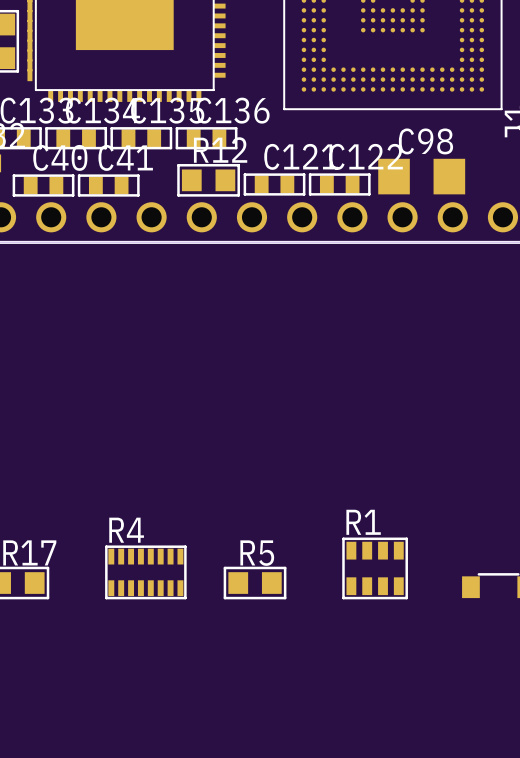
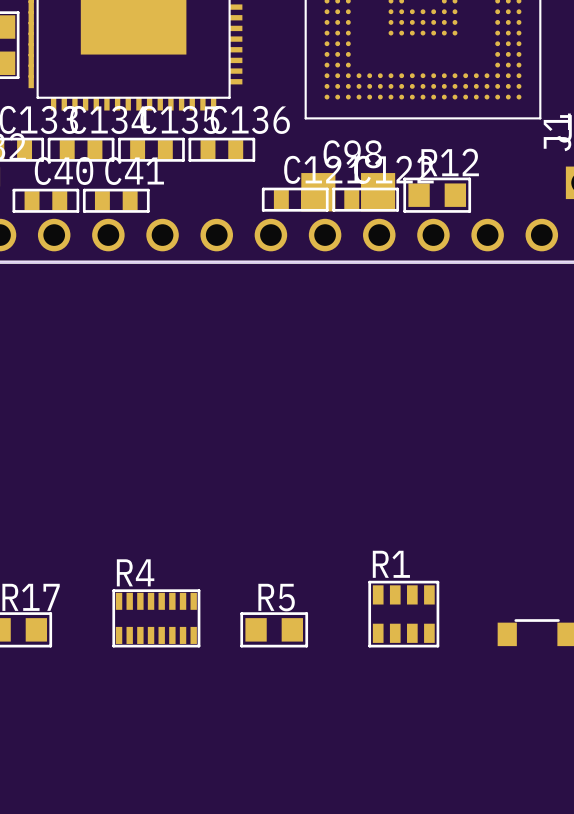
C98 position: (421, 176) -> (348, 192)
R12 position: (208, 180) -> (437, 195)

